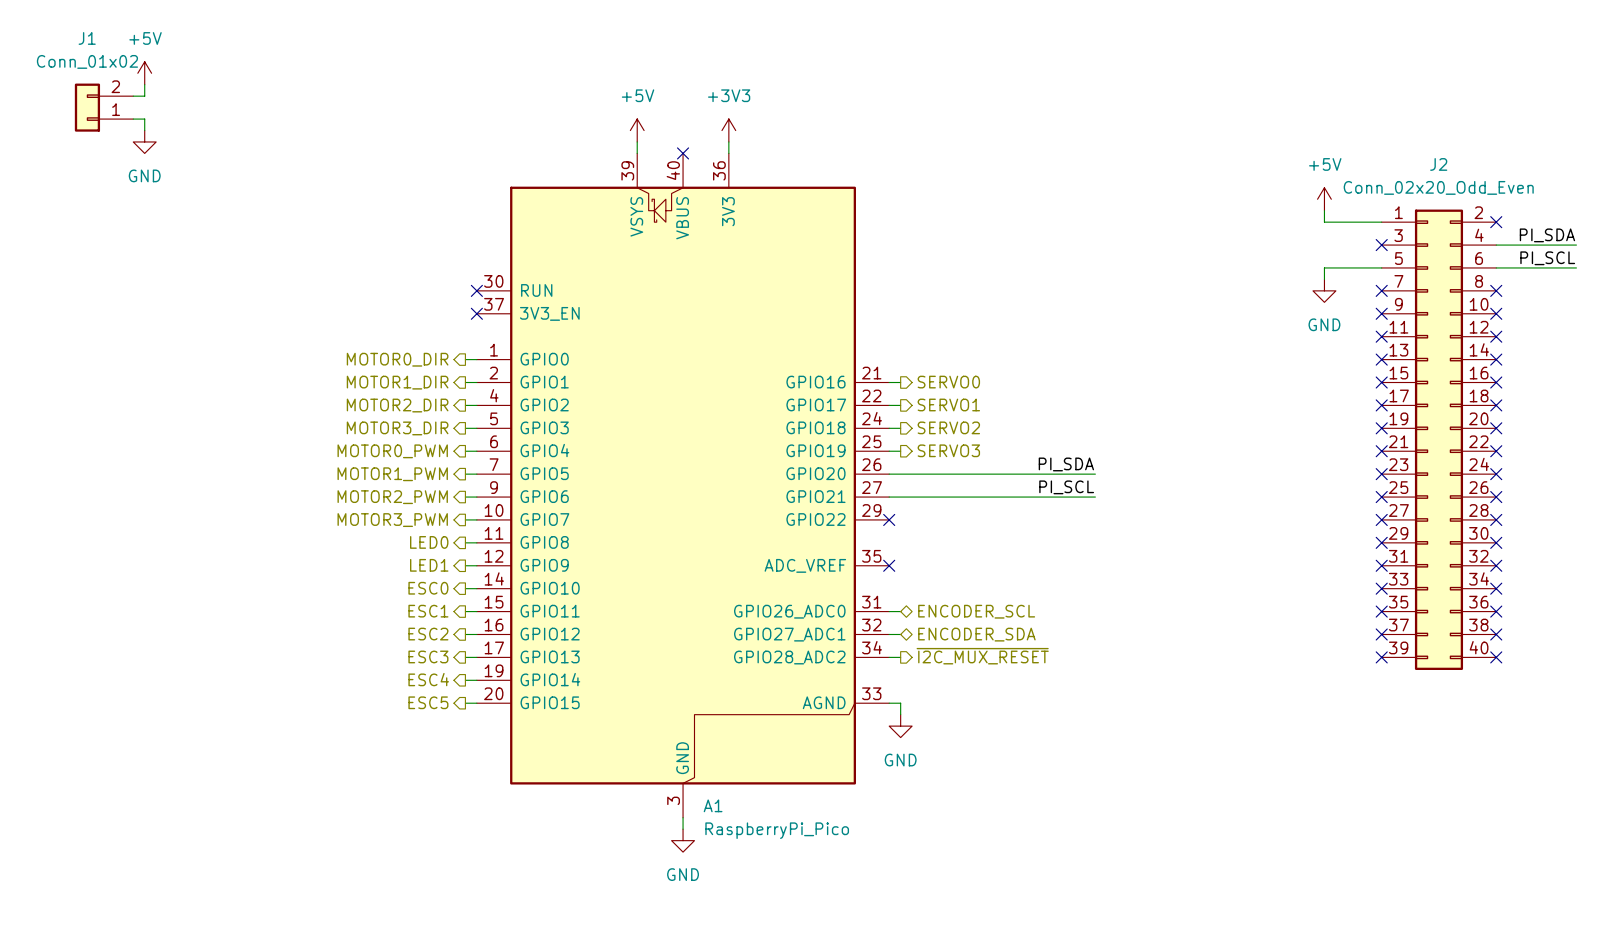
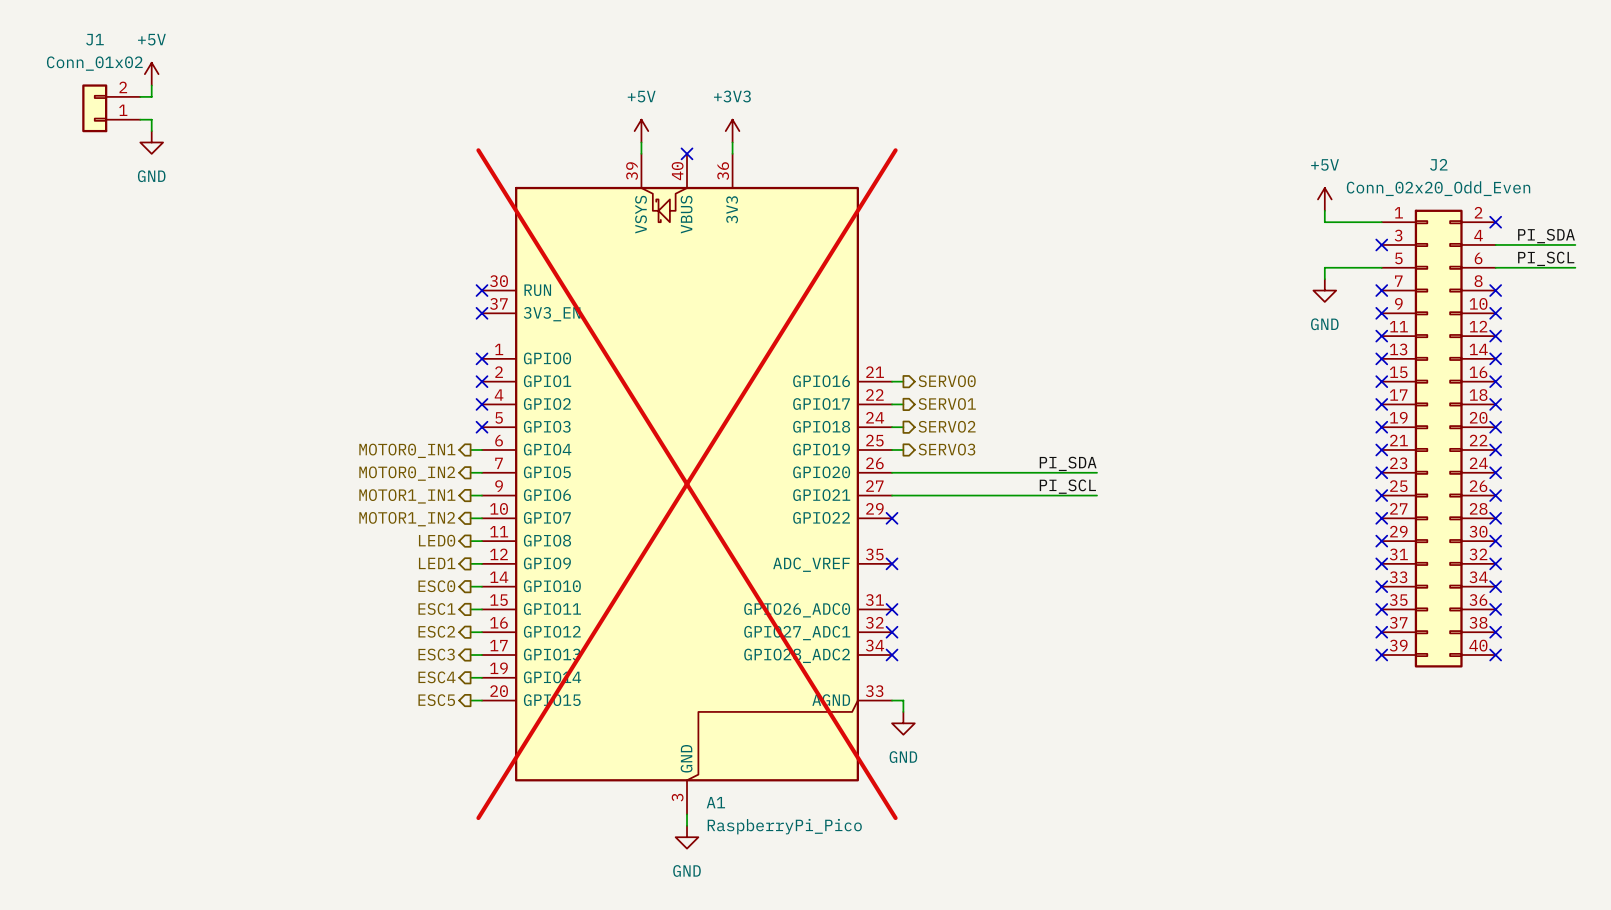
hierarchical label: MOTOR0_DIR (397, 359) -> none
wire: (465, 359) (476, 359) -> none
no-connect mark: none -> (481, 358)
hierarchical label: MOTOR1_DIR (397, 382) -> none
wire: (465, 382) (476, 382) -> none
no-connect mark: none -> (481, 381)
hierarchical label: MOTOR2_DIR (397, 405) -> none
wire: (465, 405) (476, 405) -> none
no-connect mark: none -> (481, 404)
hierarchical label: MOTOR3_DIR (397, 428) -> none
wire: (465, 428) (476, 428) -> none
no-connect mark: none -> (481, 427)
hierarchical label: MOTOR0_PWM (392, 451) -> MOTOR0_IN1 (407, 450)
hierarchical label: MOTOR1_PWM (392, 474) -> MOTOR0_IN2 (407, 473)
A1 do-not-place cross: none -> (687, 484)
hierarchical label: MOTOR2_PWM (392, 497) -> MOTOR1_IN1 (407, 496)
hierarchical label: MOTOR3_PWM (392, 520) -> MOTOR1_IN2 (407, 519)
wire: (889, 611) (900, 611) -> none
no-connect mark: none -> (892, 609)
hierarchical label: ENCODER_SCL (976, 611) -> none
wire: (889, 634) (900, 634) -> none
no-connect mark: none -> (892, 632)
hierarchical label: ENCODER_SDA (976, 634) -> none
hierarchical label: ~{I2C_MUX_RESET} (982, 656) -> none
wire: (889, 657) (900, 657) -> none
no-connect mark: none -> (892, 655)

